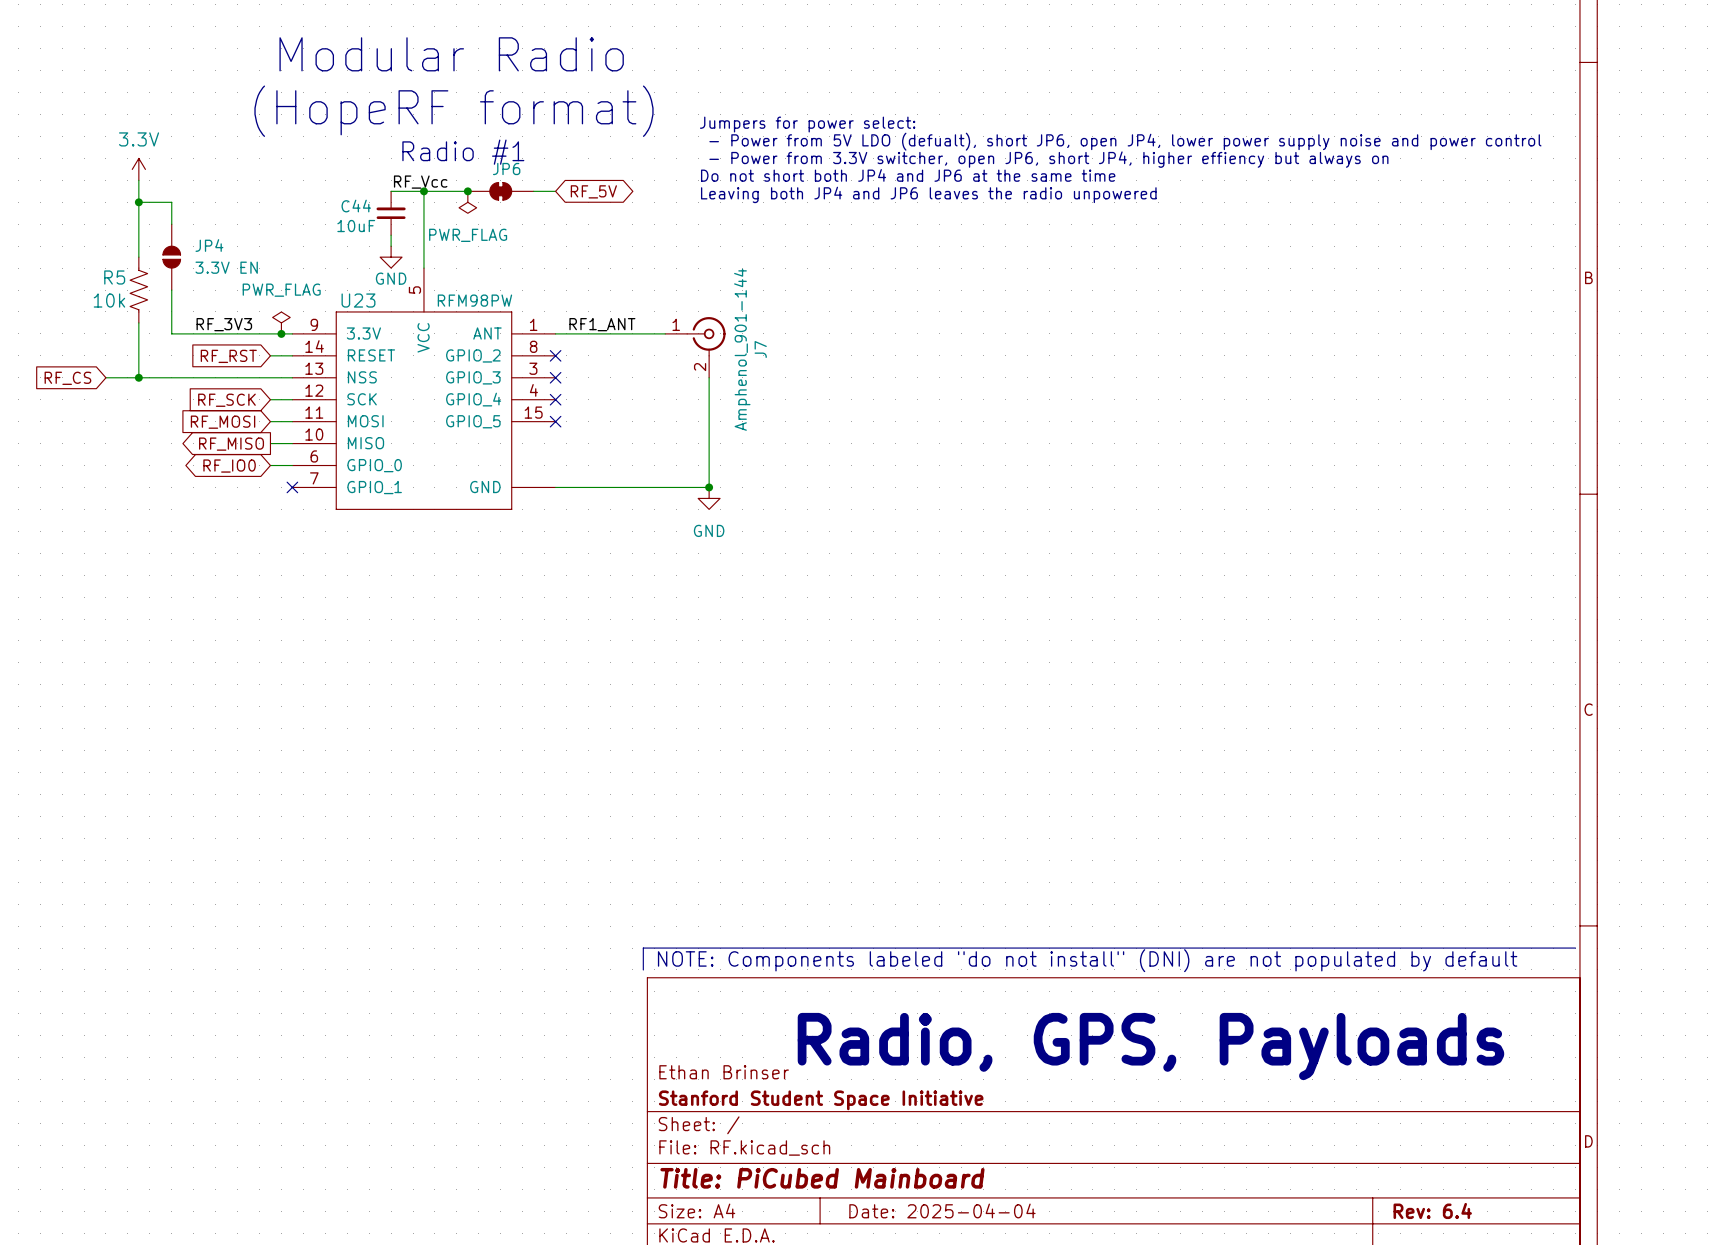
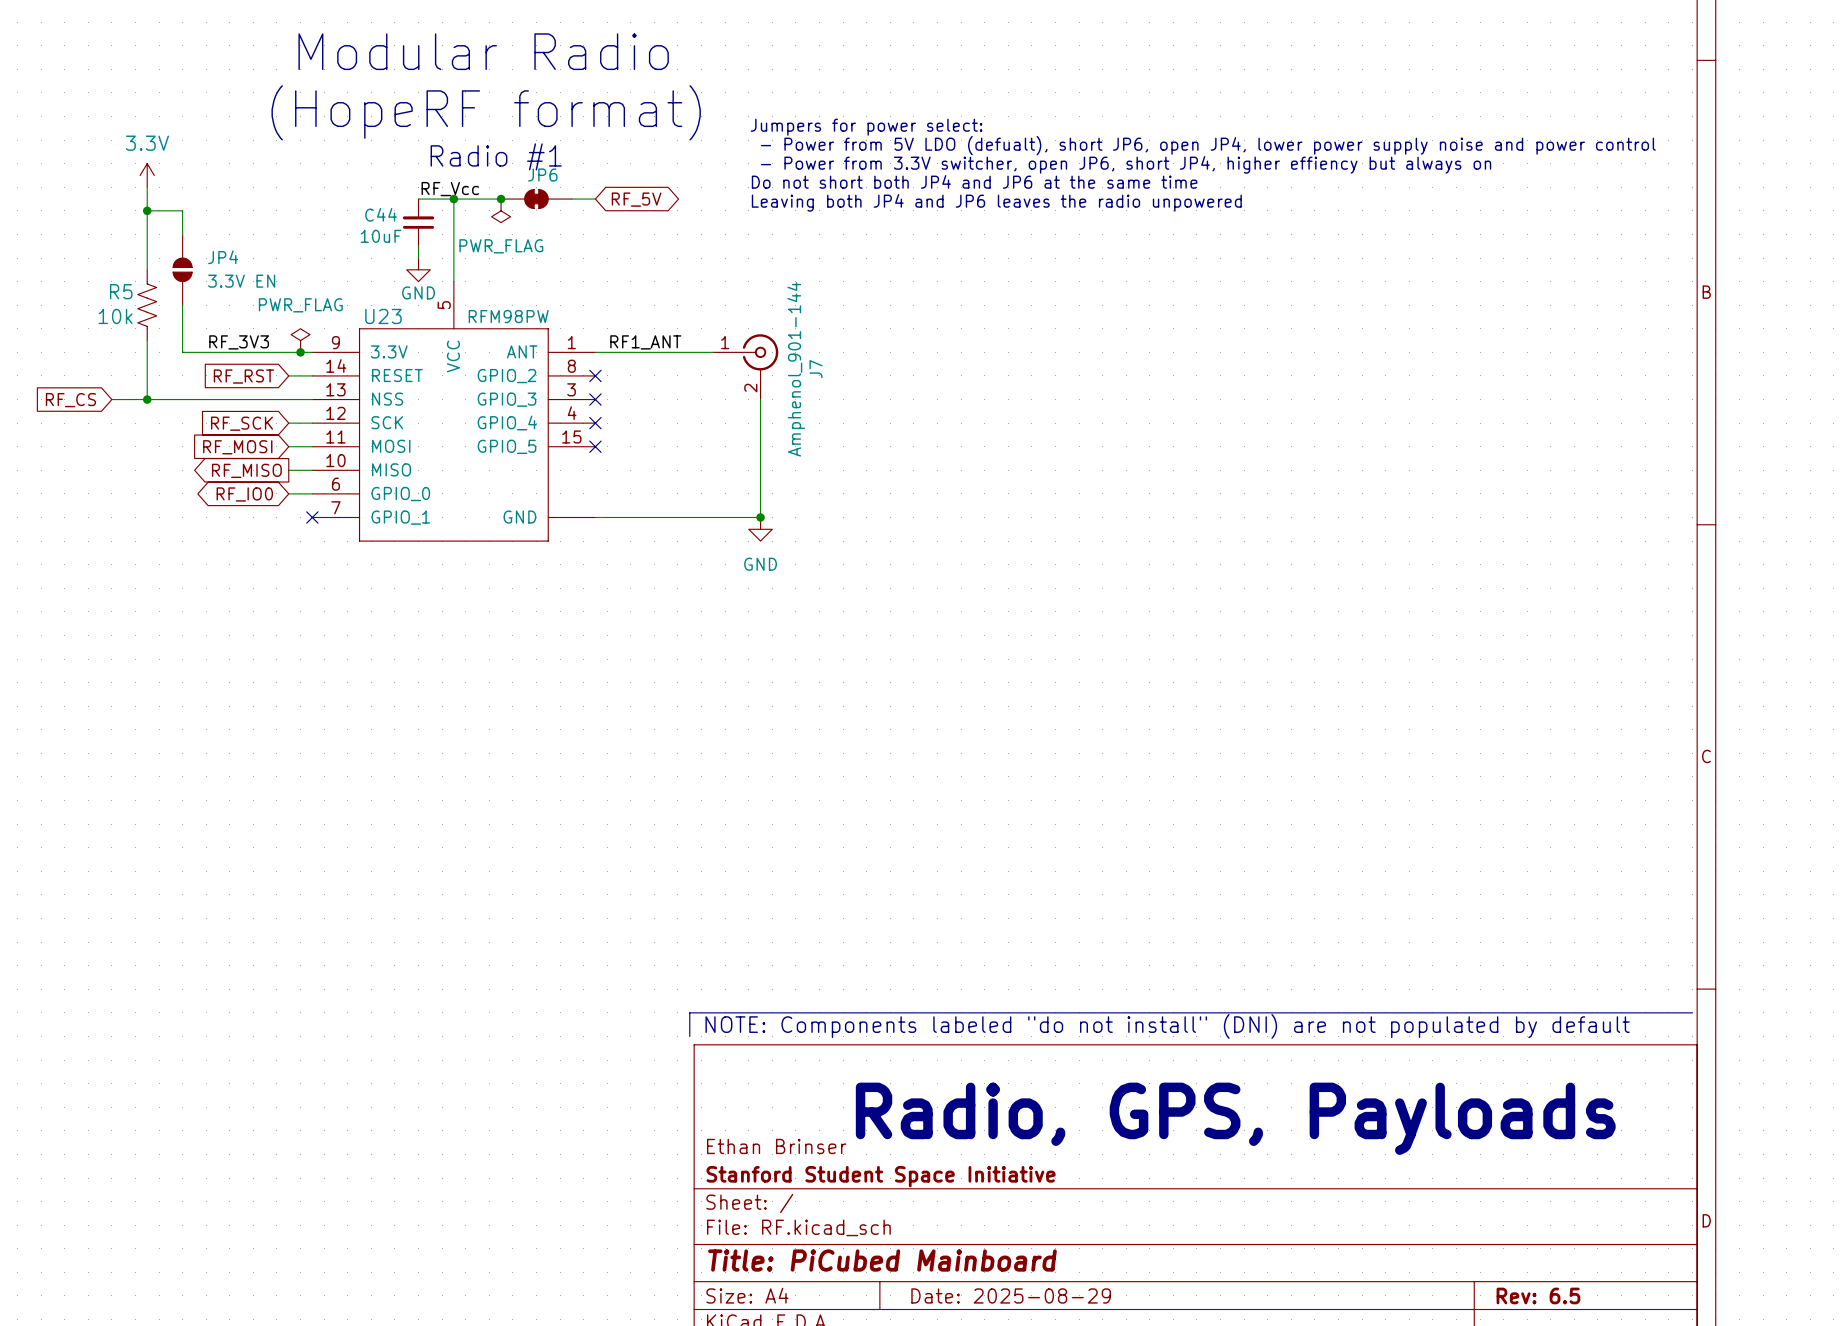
title block: Date: 2025-04-04 (942, 1210) -> Date: 2025-08-29 (1011, 1295)
title block: Rev: 6.4 (1432, 1210) -> Rev: 6.5 (1538, 1295)

